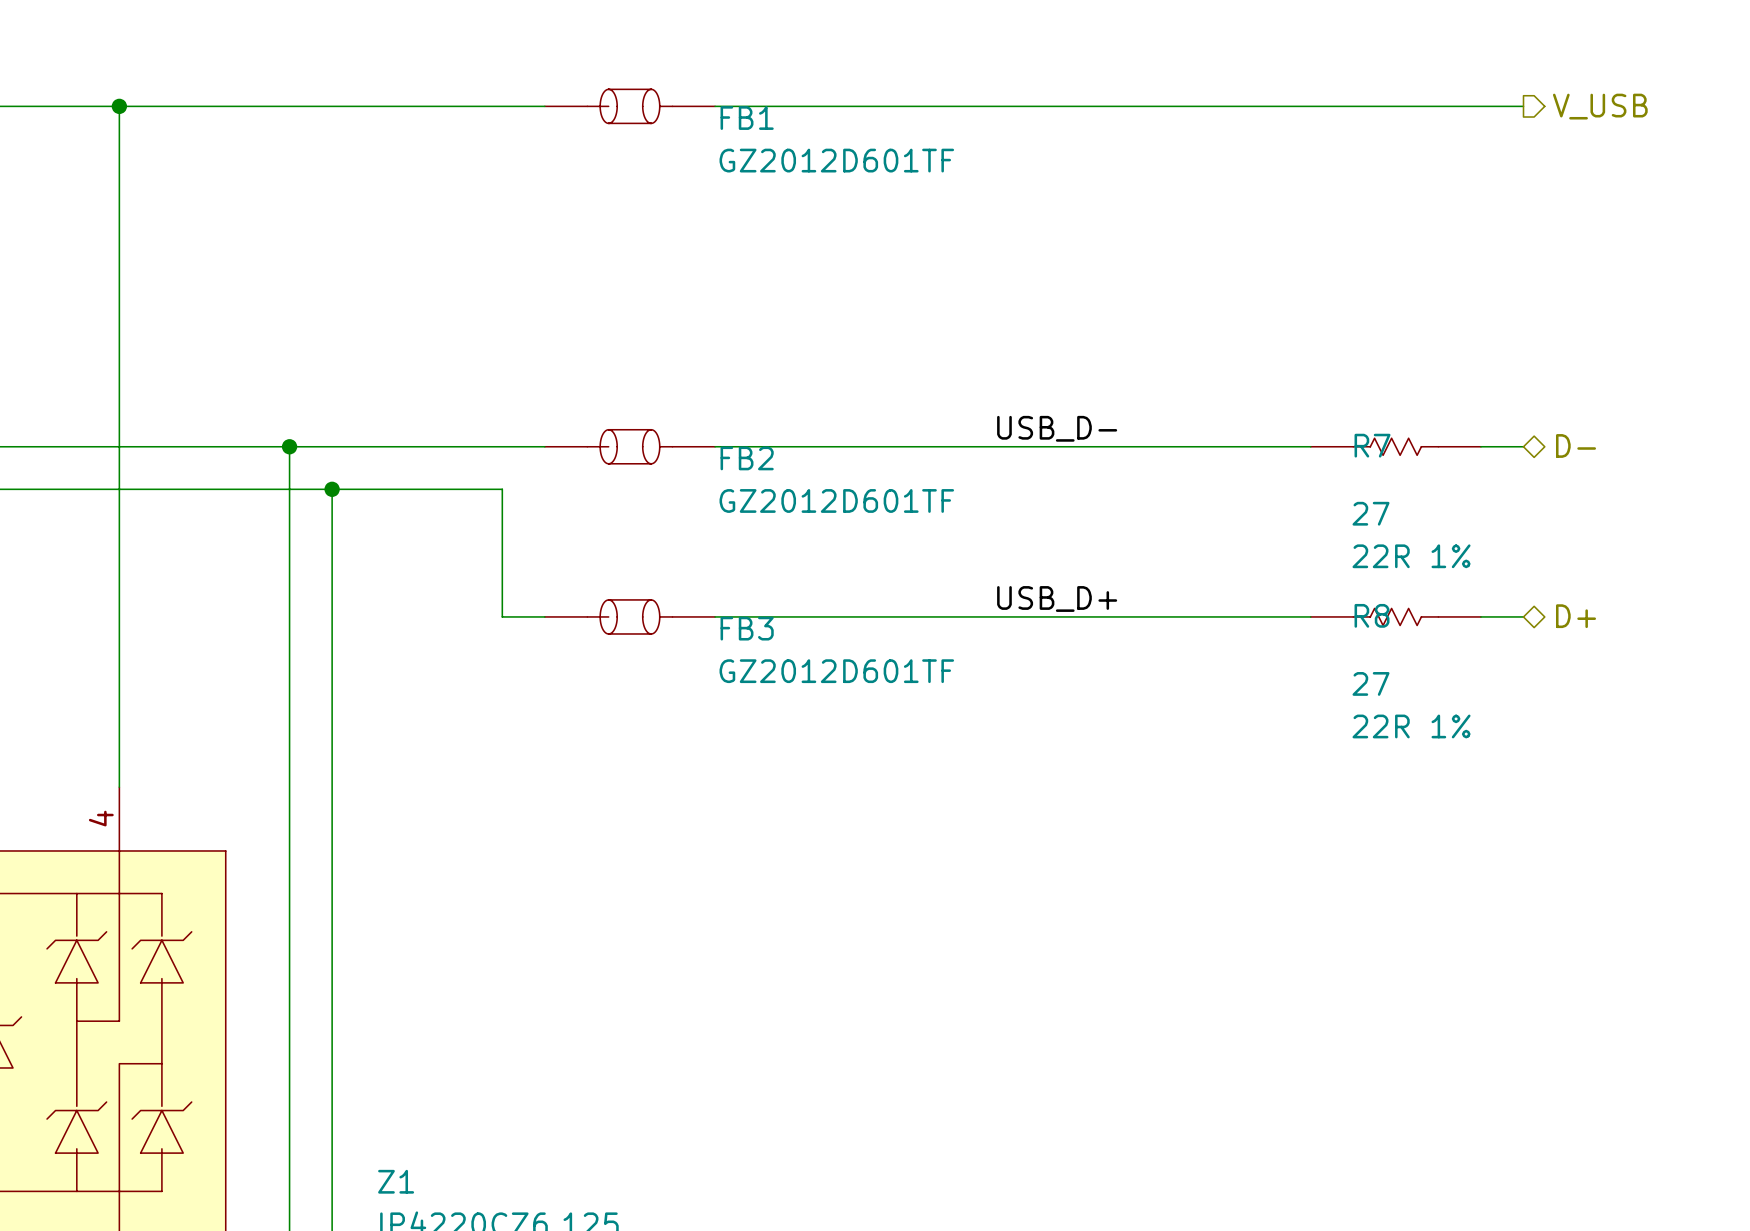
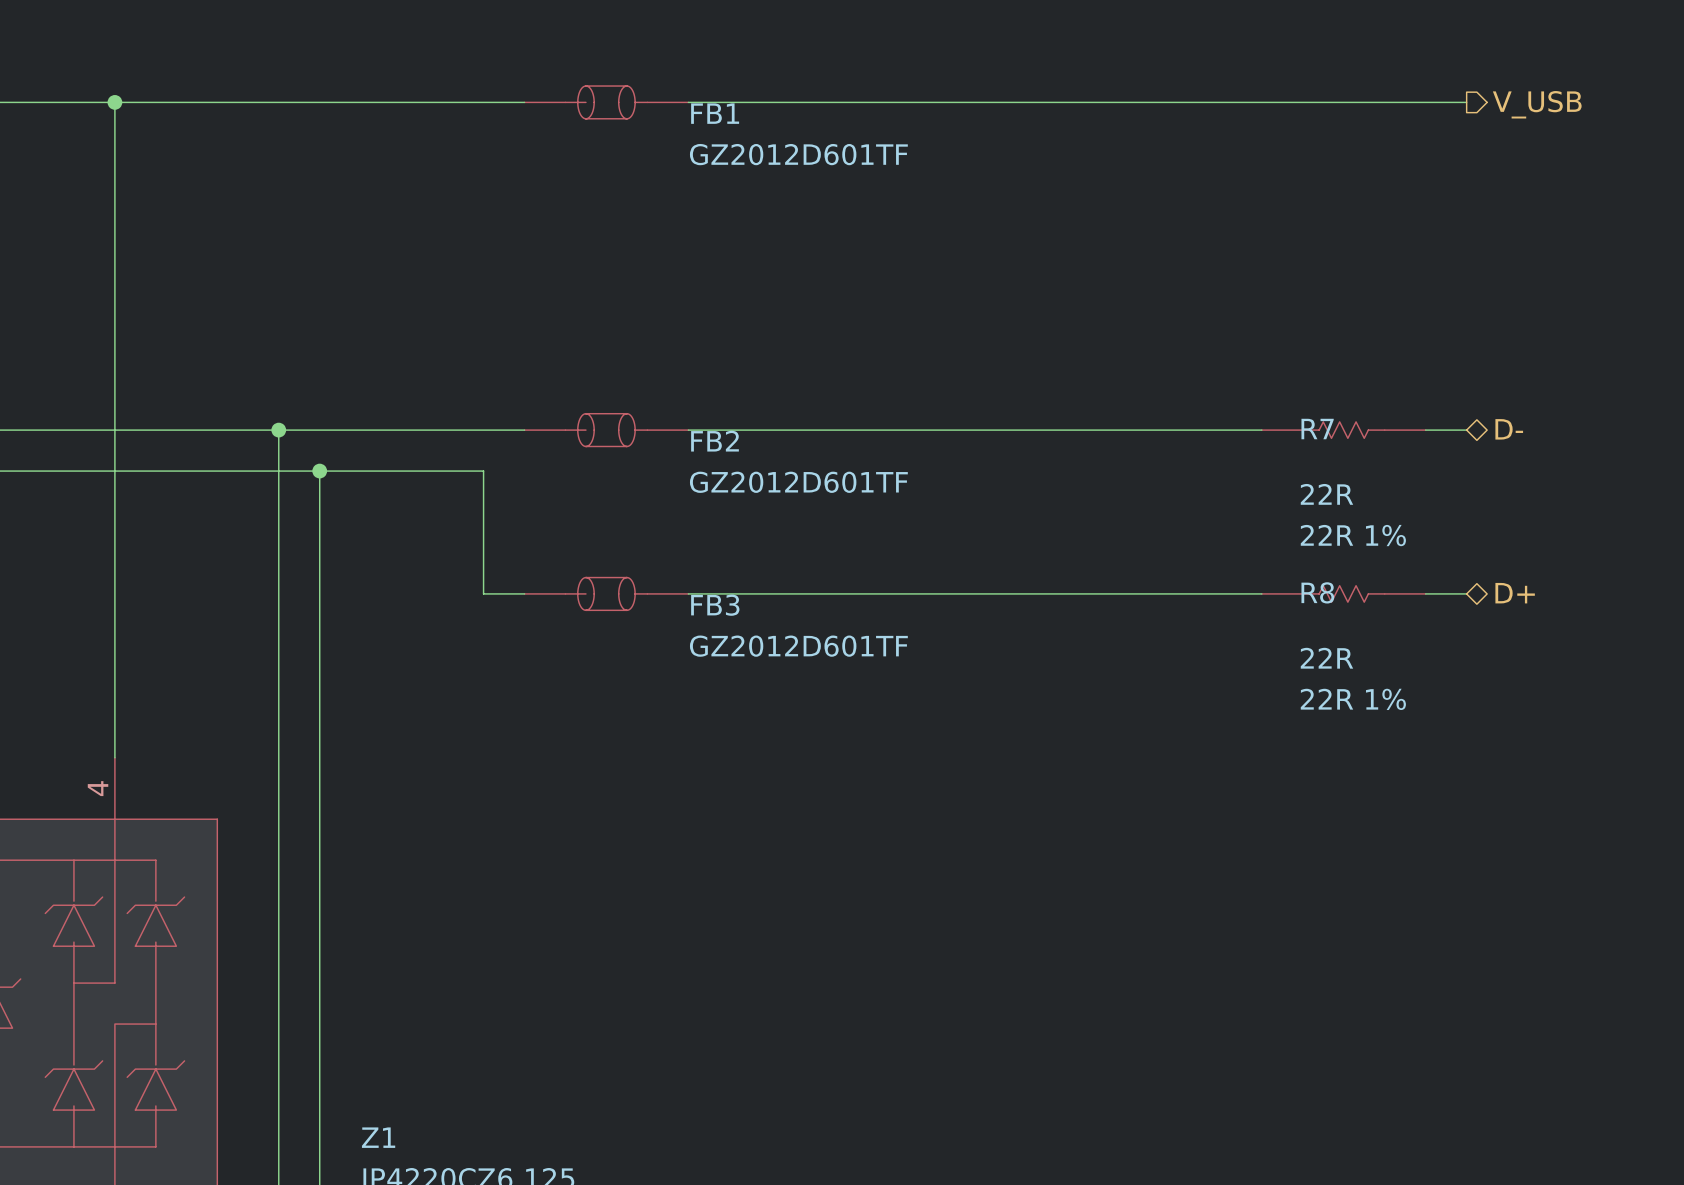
label: USB_D- (1057, 428) -> none
R7 value: 27 (1370, 513) -> 22R (1326, 494)
label: USB_D+ (1057, 598) -> none
R8 value: 27 (1370, 683) -> 22R (1326, 658)

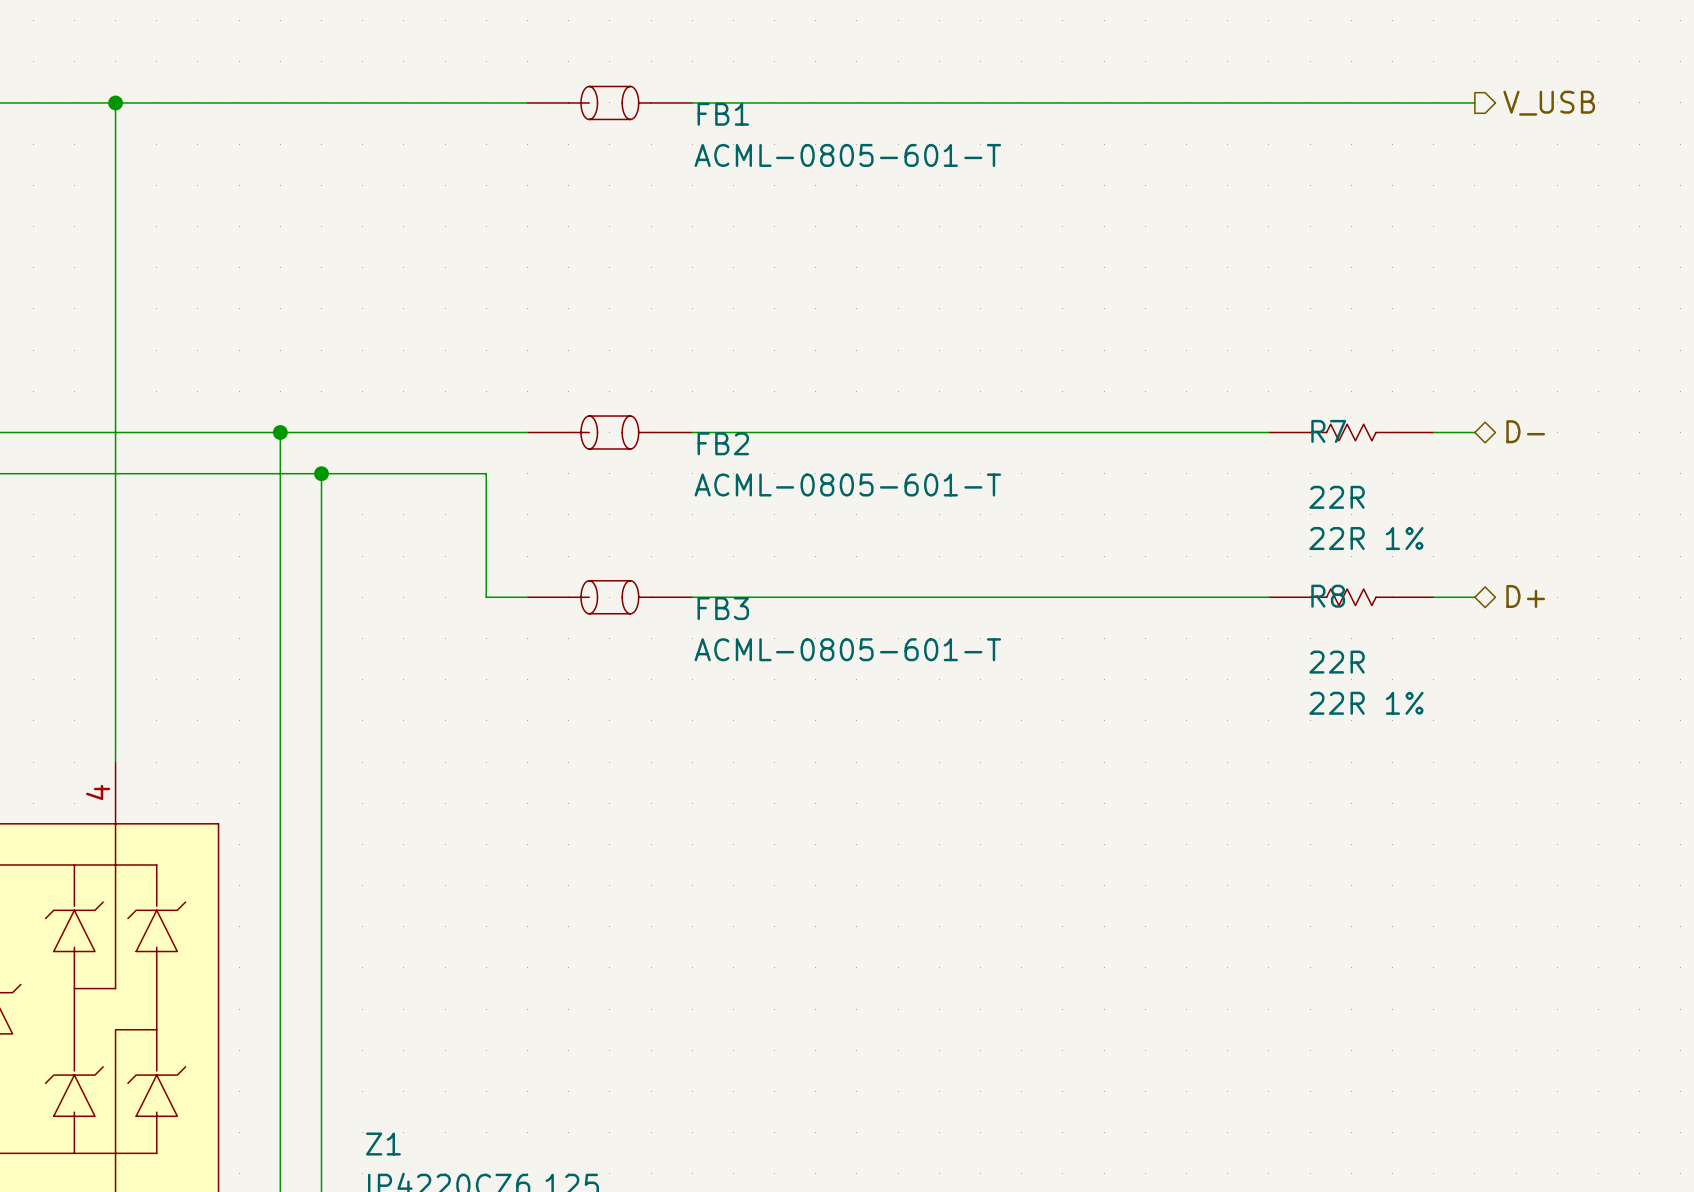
FB1 value: GZ2012D601TF (798, 154) -> ACML-0805-601-T (847, 155)
FB2 value: GZ2012D601TF (798, 482) -> ACML-0805-601-T (847, 484)
FB3 value: GZ2012D601TF (798, 646) -> ACML-0805-601-T (847, 649)

